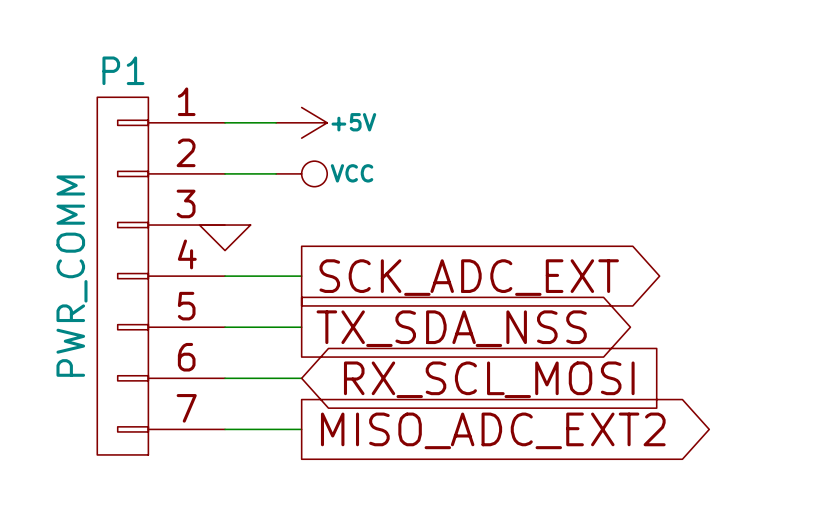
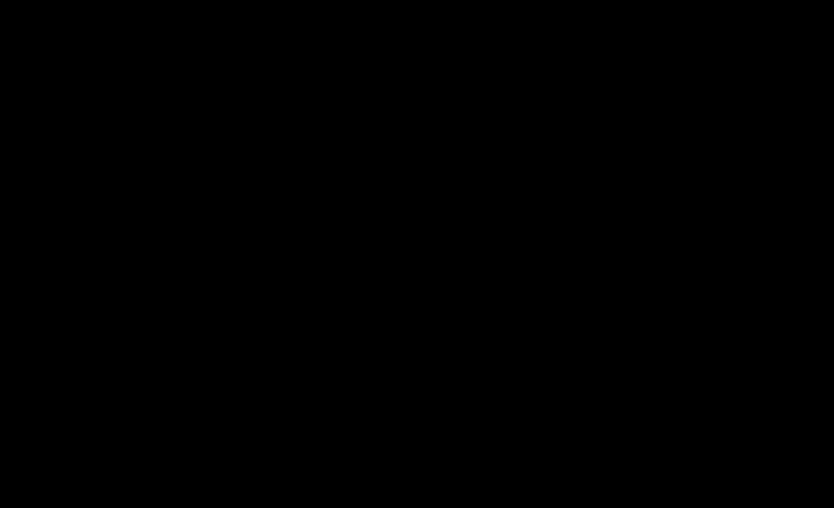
wire: (225, 122) (276, 122) -> none
power symbol: +5V (301, 122) -> none
wire: (225, 173) (276, 173) -> none
power symbol: VCC (301, 173) -> none
power symbol: (225, 237) -> none
P1: PWR_COMM (161, 276) -> none
wire: (225, 276) (301, 276) -> none
global label: SCK_ADC_EXT (469, 277) -> none
wire: (225, 327) (301, 327) -> none
global label: TX_SDA_NSS (451, 328) -> none
wire: (225, 378) (301, 378) -> none
global label: RX_SCL_MOSI (489, 379) -> none
wire: (225, 429) (301, 429) -> none
global label: MISO_ADC_EXT2 (493, 430) -> none

